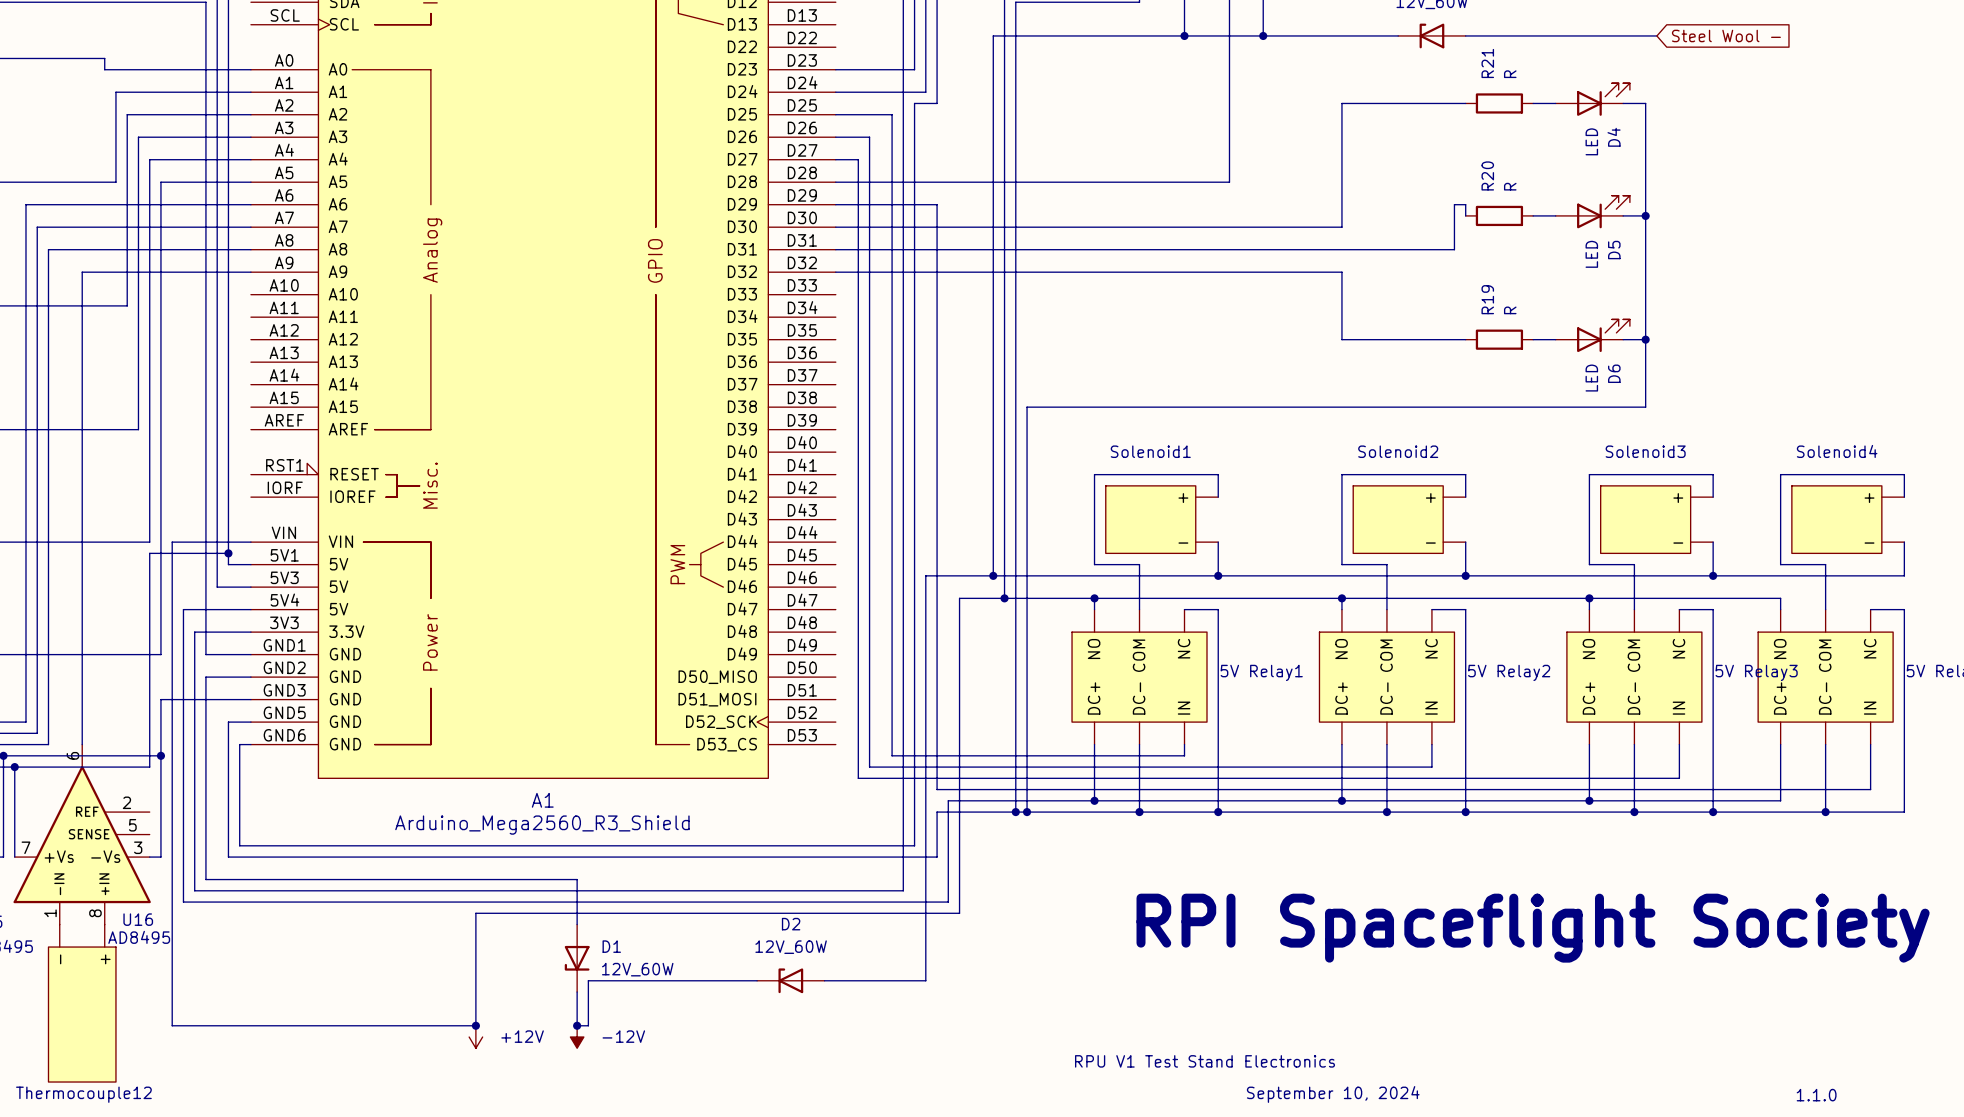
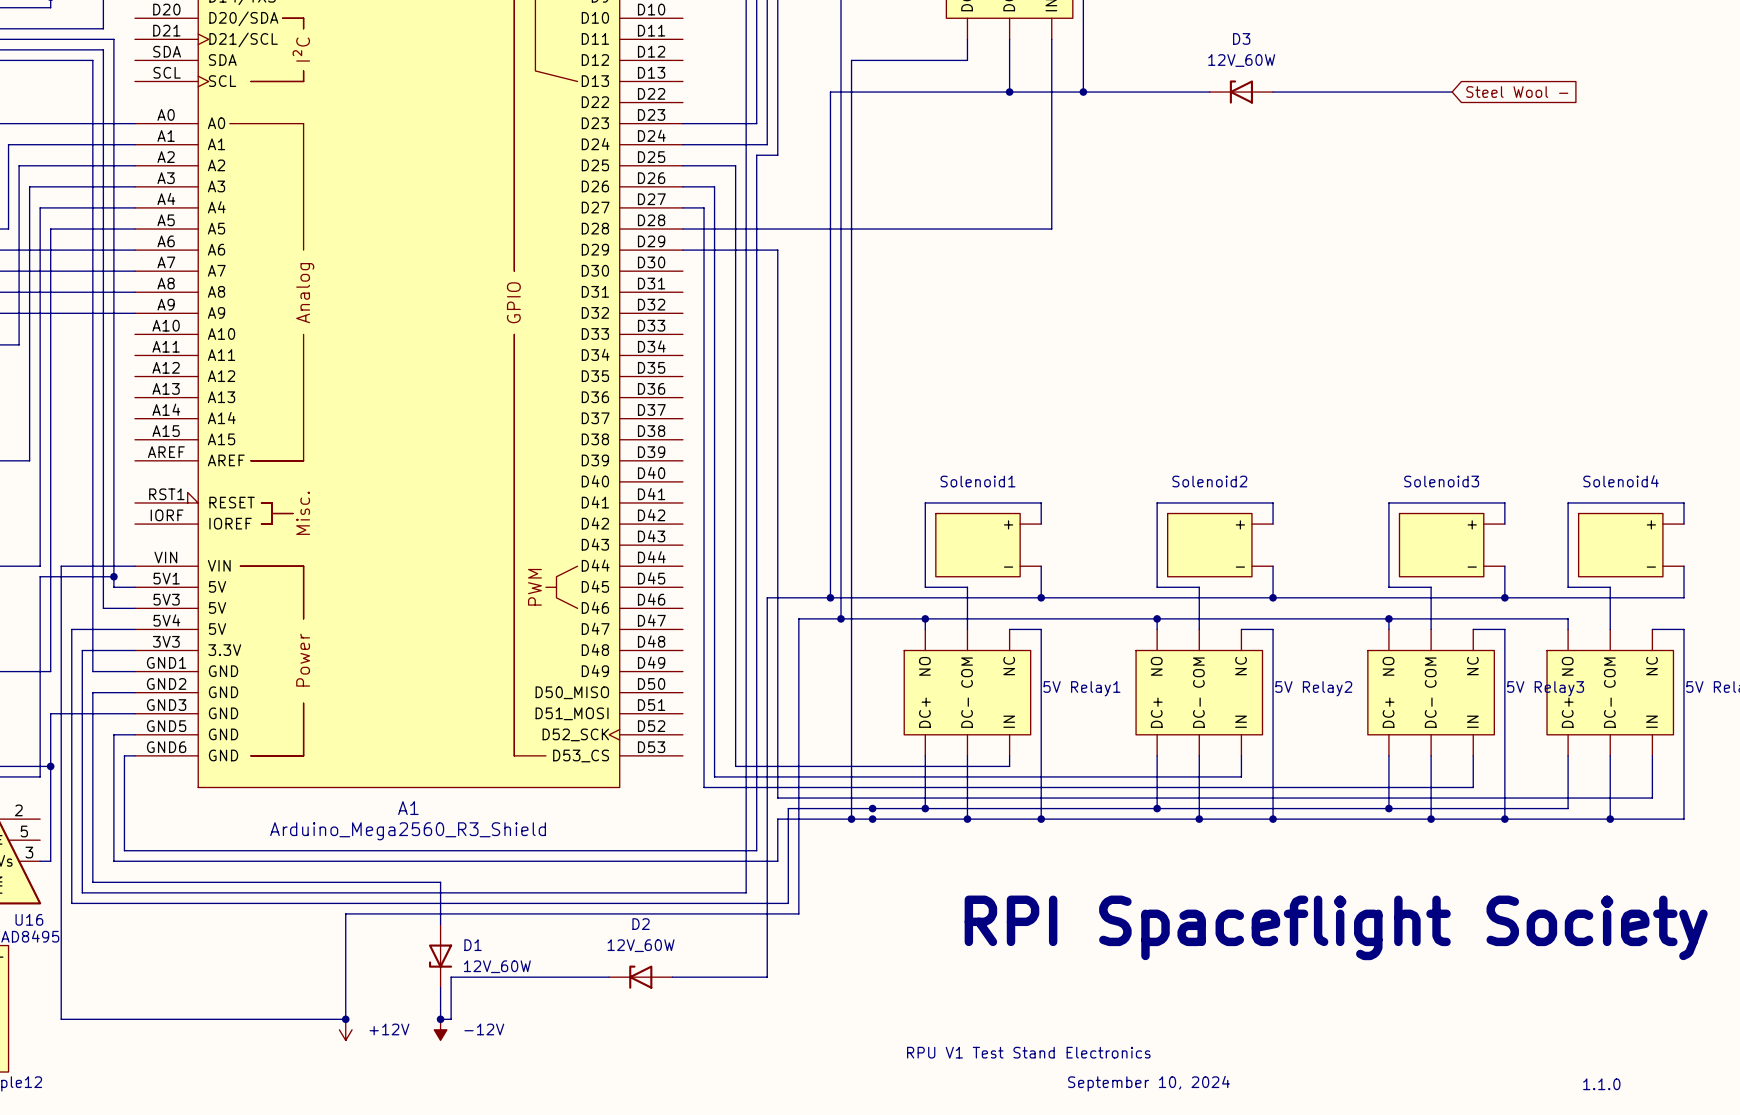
D4: LED (1592, 99) -> none
wire: (1465, 103) (1341, 103) (1341, 227) (835, 227) -> none
R21: R (1499, 103) -> none
wire: (1533, 103) (1555, 103) -> none
wire: (1623, 103) (1645, 103) (1645, 407) (1027, 407) (1027, 812) -> none
D5: LED (1592, 212) -> none
wire: (1465, 215) (1465, 204) (1454, 204) (1454, 249) (835, 249) -> none
R20: R (1499, 215) -> none
wire: (1533, 215) (1555, 215) -> none
wire: (1623, 215) (1645, 215) -> none
junction: (1645, 215) -> none
wire: (835, 272) (1341, 272) (1341, 339) (1465, 339) -> none
D6: LED (1592, 335) -> none
R19: R (1499, 339) -> none
wire: (1533, 339) (1555, 339) -> none
wire: (1623, 339) (1645, 339) -> none
junction: (1645, 339) -> none
junction: none -> (872, 808)
junction: (1027, 812) -> none
junction: none -> (872, 819)

